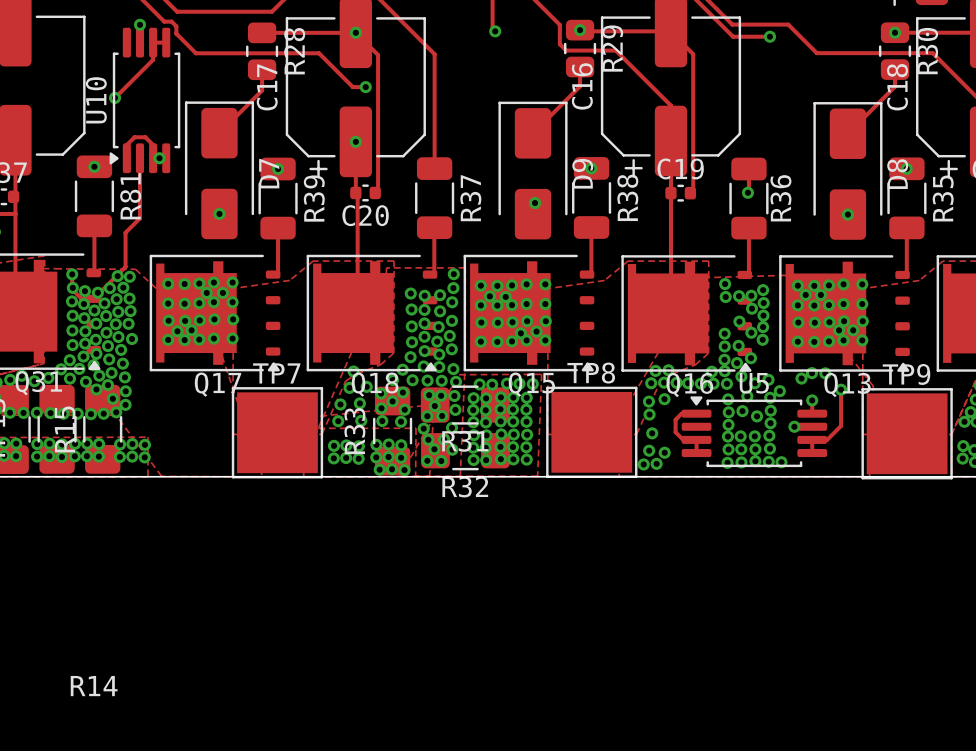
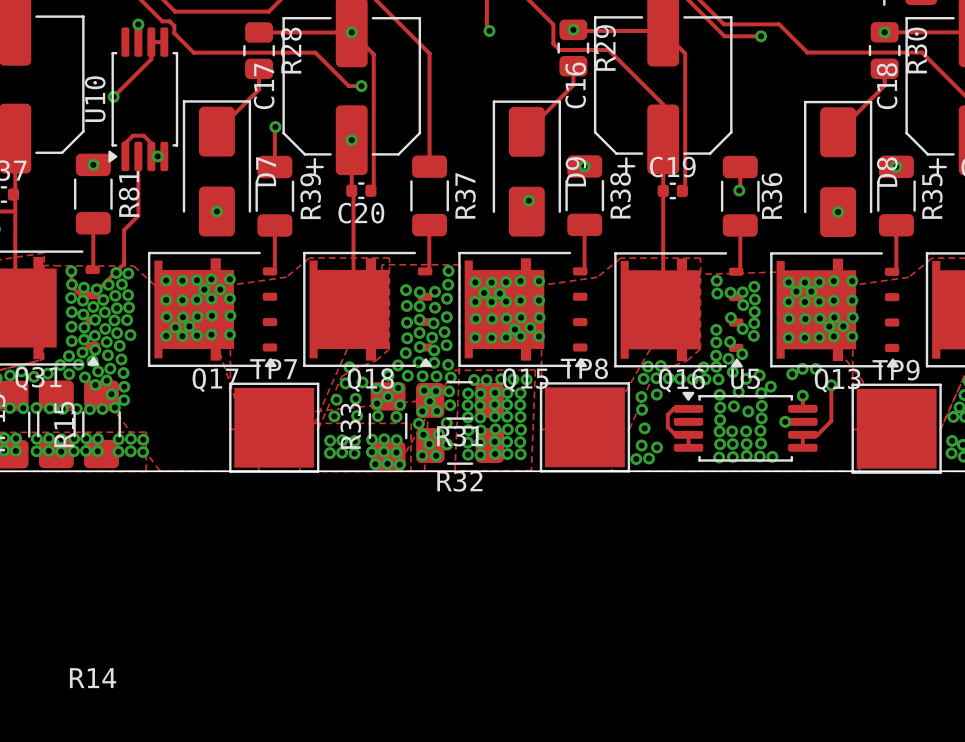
track: none -> (275, 127) (274, 167)
via position: (278, 169) -> (275, 127)

